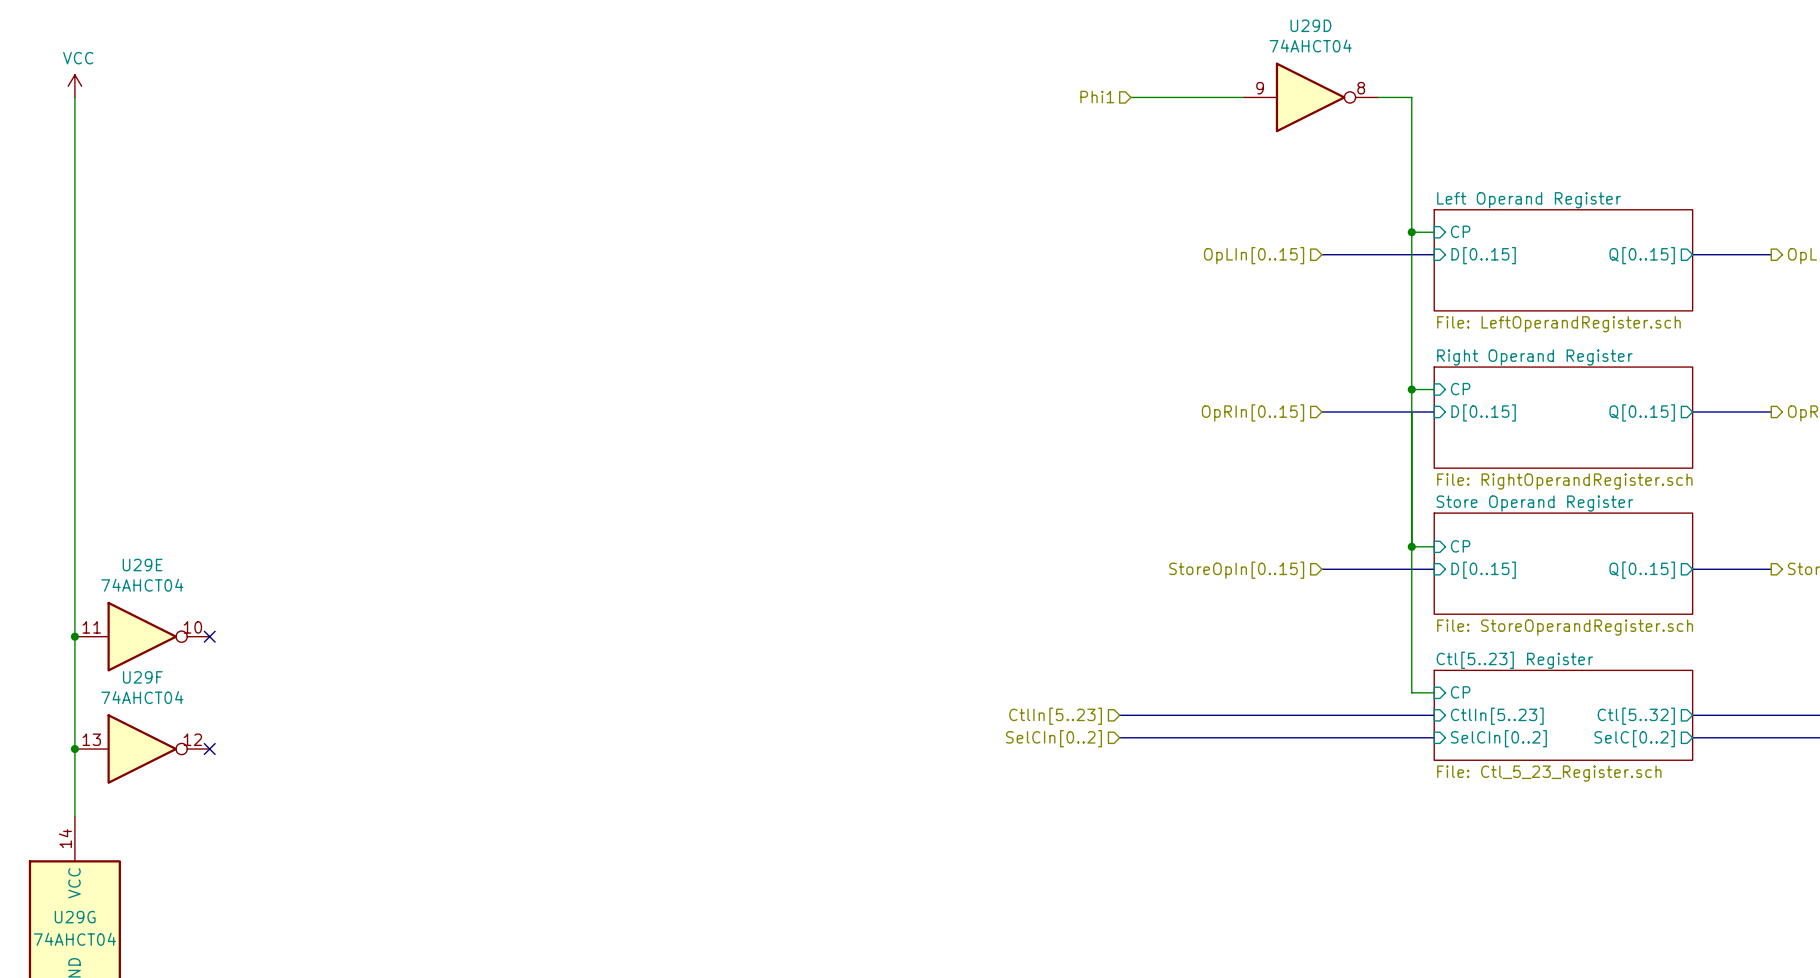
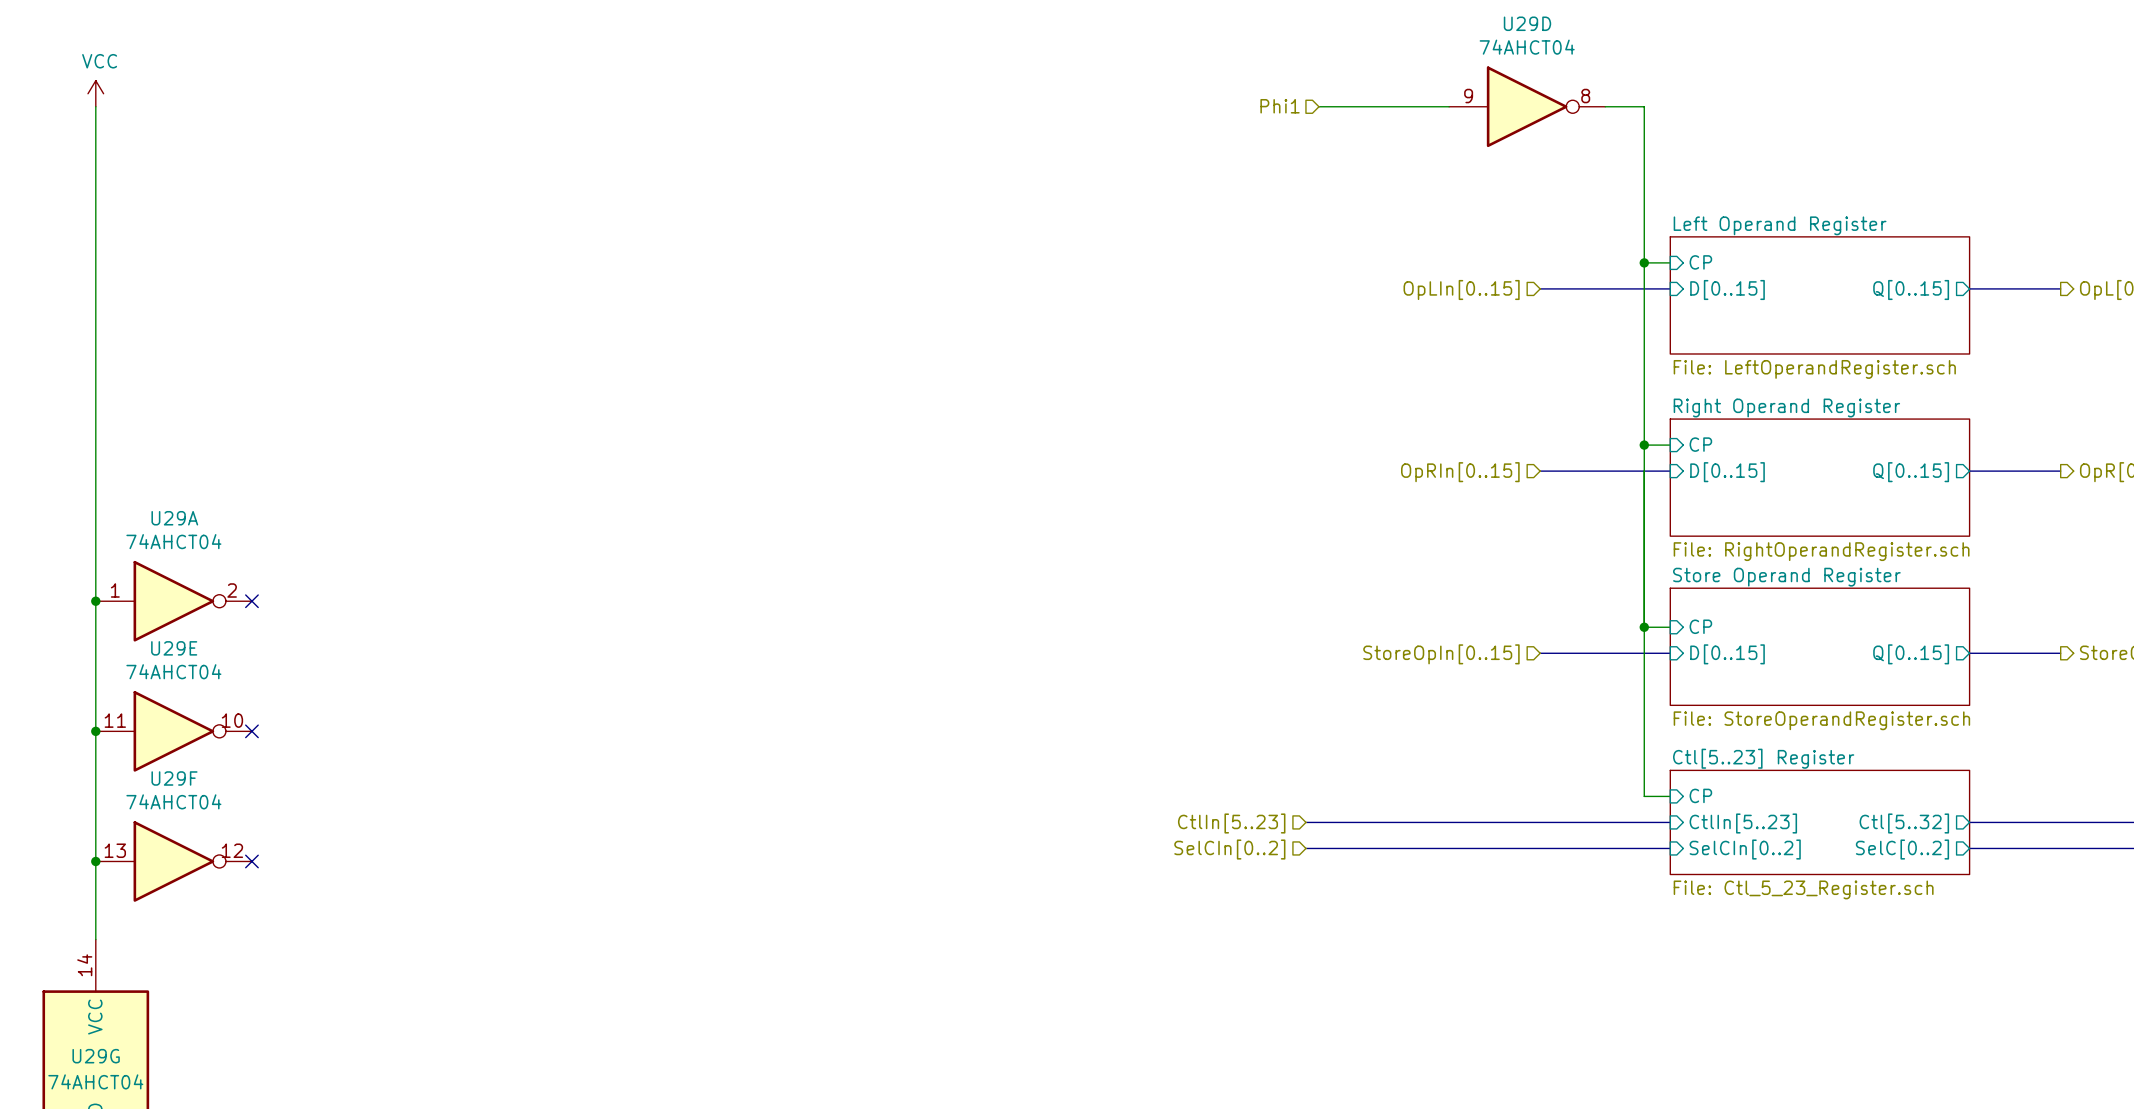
junction: none -> (95, 601)
U29A: none -> 74AHCT04 (173, 601)
no-connect mark: none -> (251, 601)

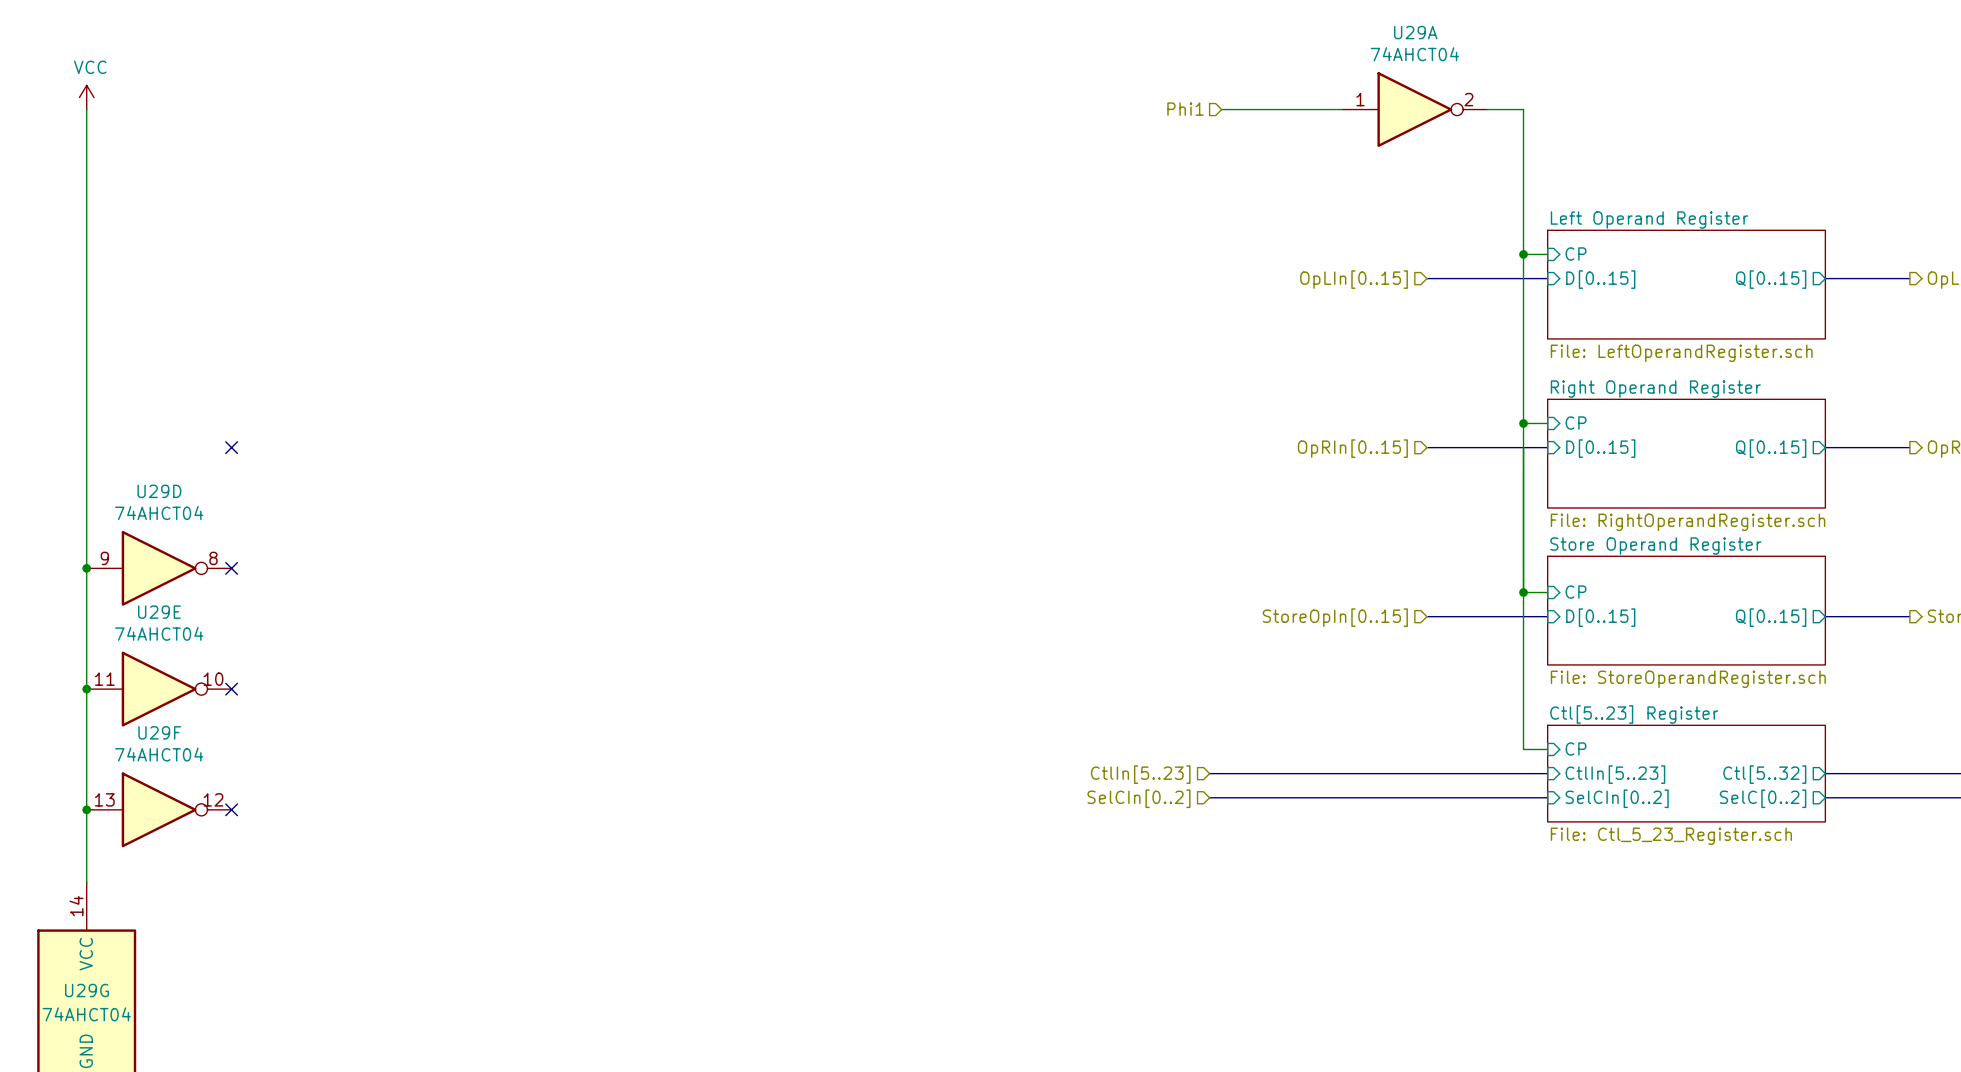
U29D position: (1527, 106) -> (159, 568)
no-connect mark: none -> (231, 447)
U29A position: (173, 601) -> (1414, 109)

